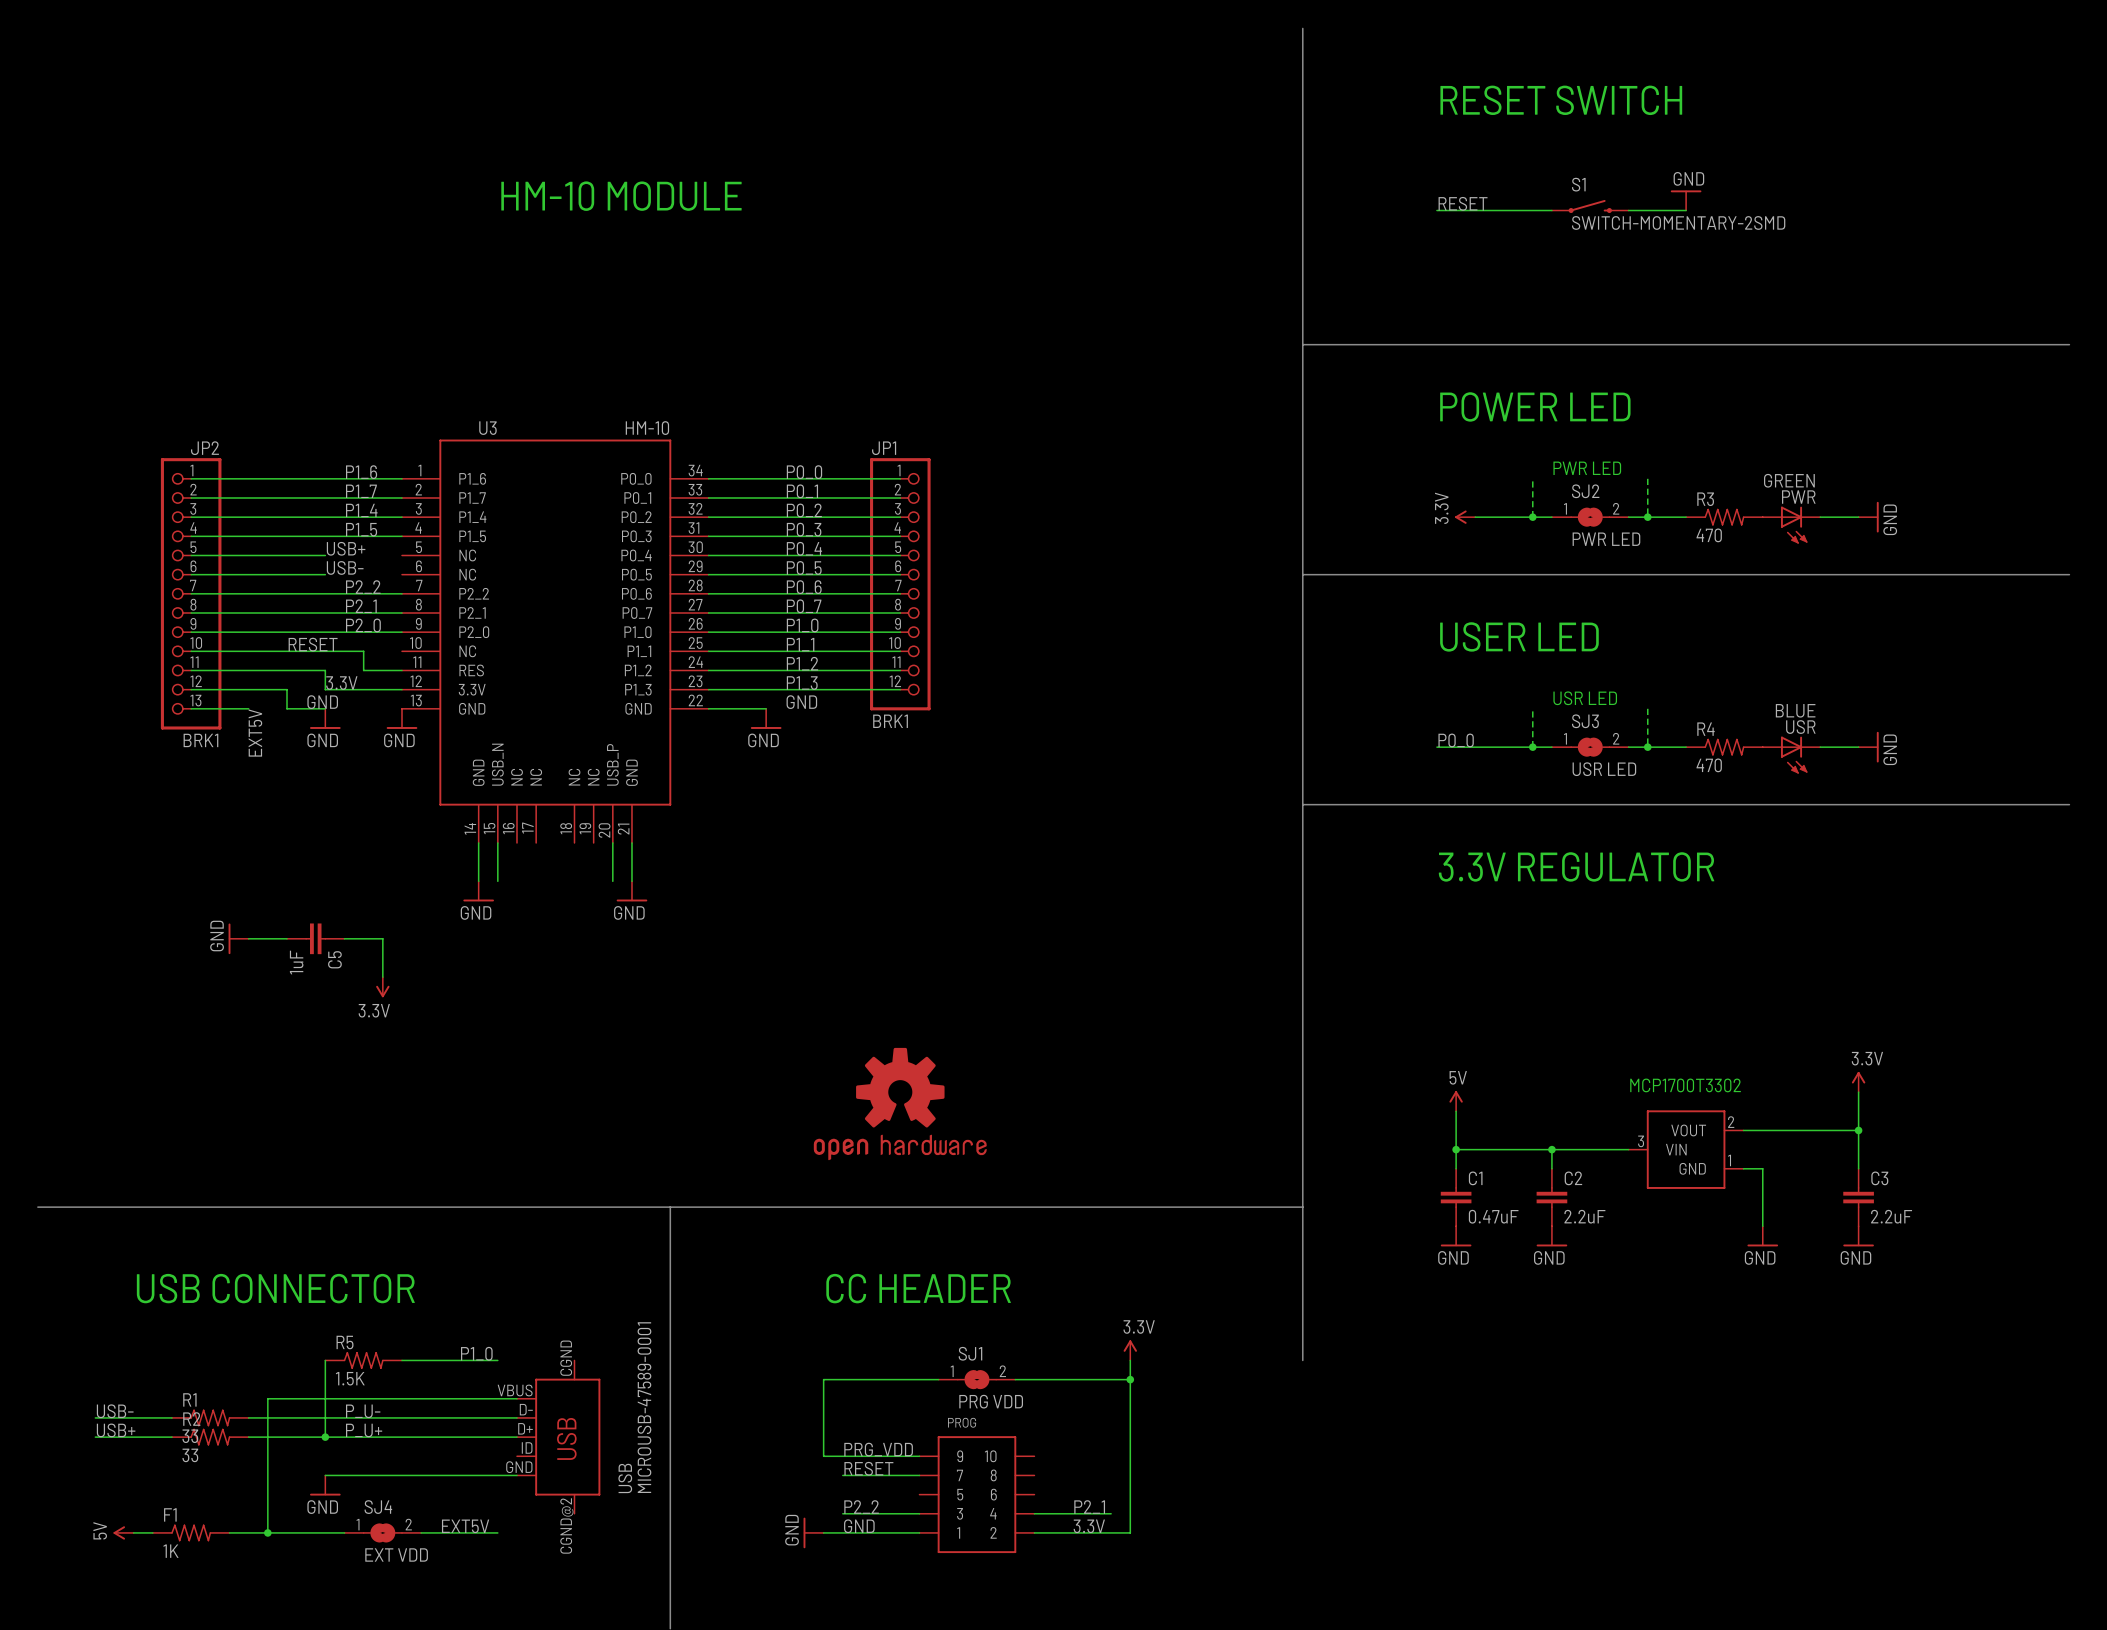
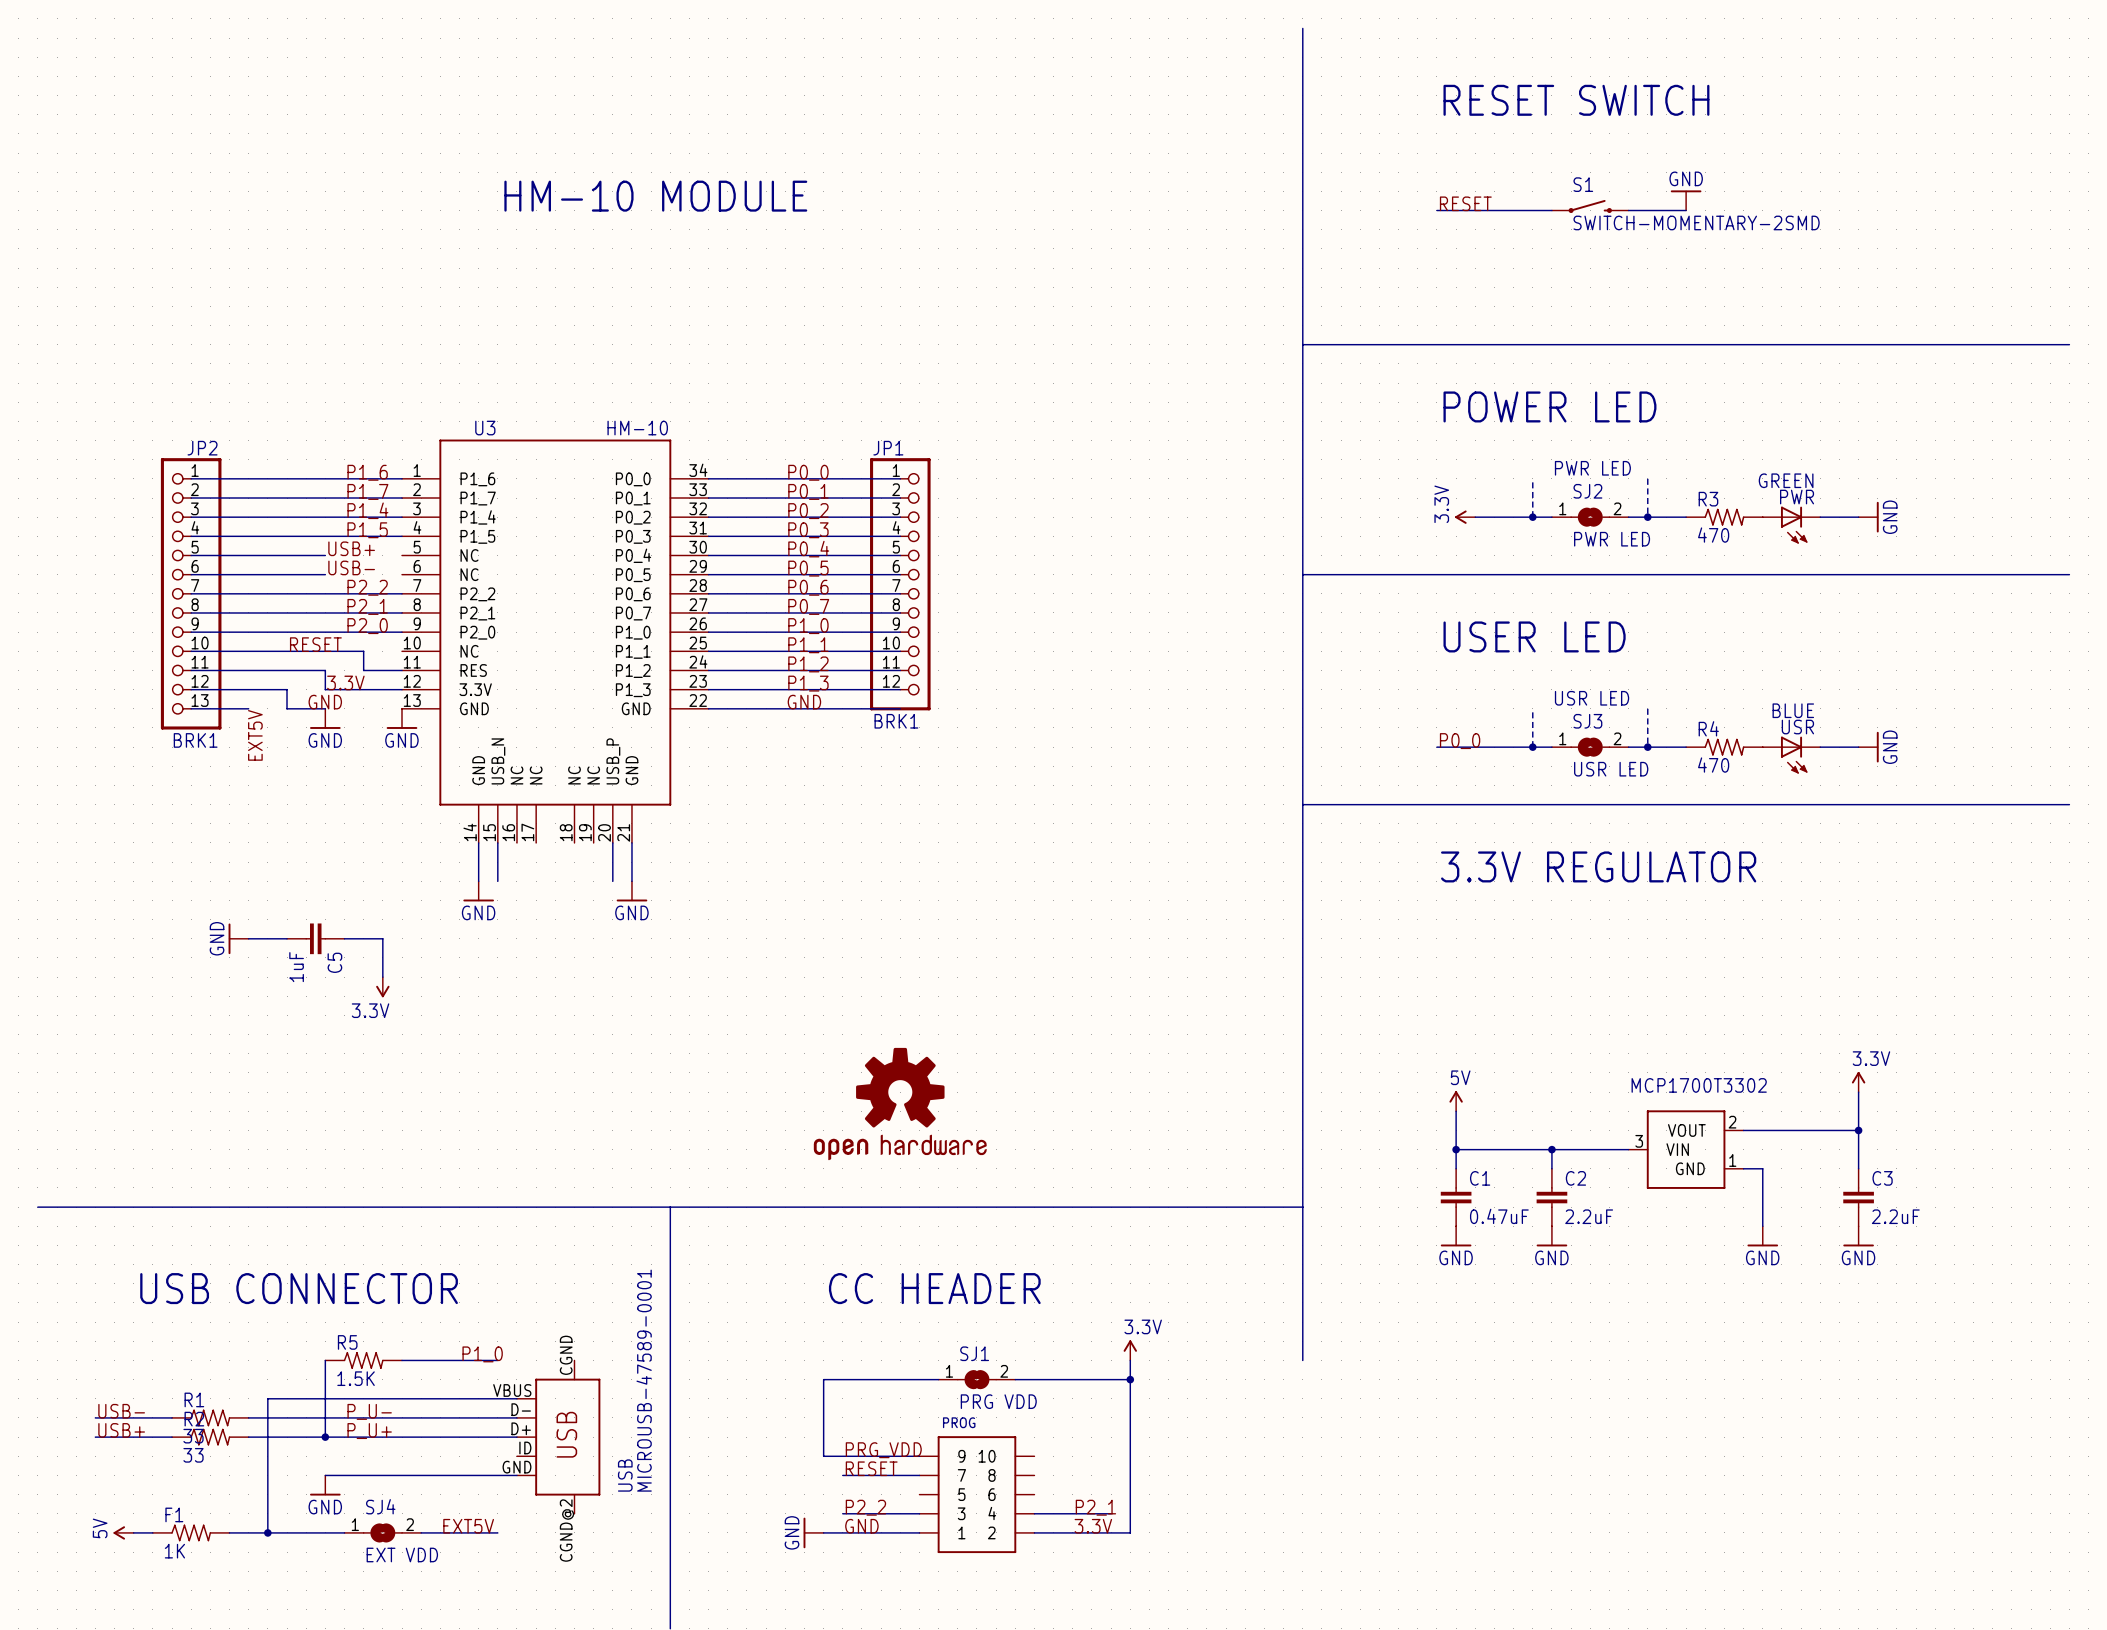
wire: none -> (766, 708) (900, 708)
power symbol: GND (766, 718) -> none

